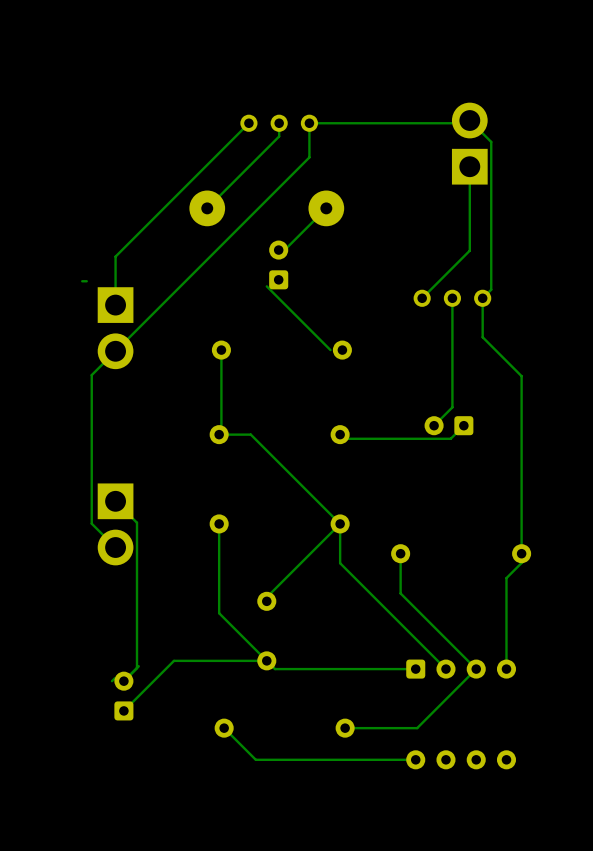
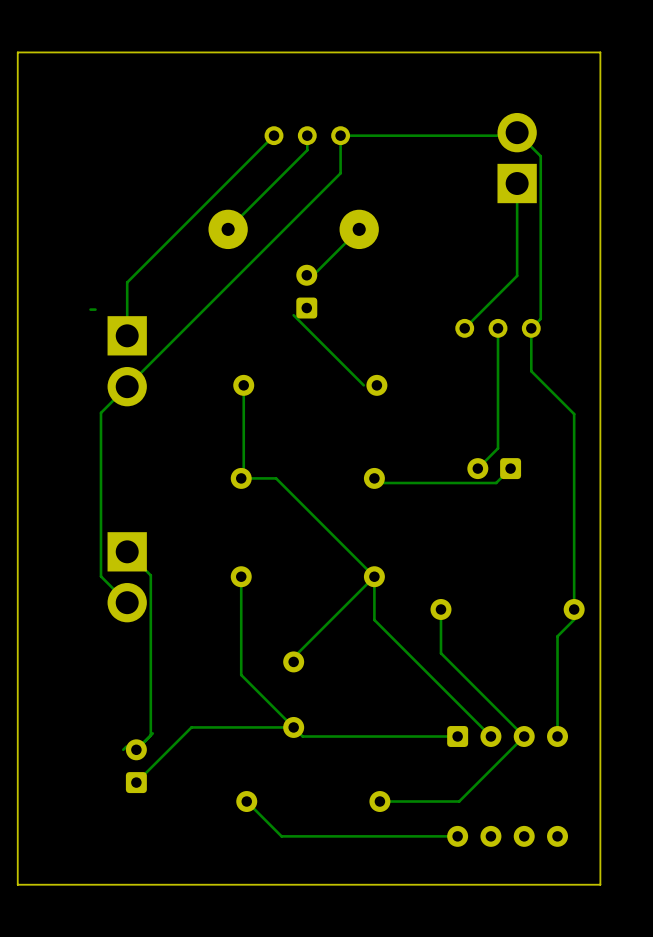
board edge: none -> (600, 52) (17, 52) (17, 884) (600, 884) (600, 52)

